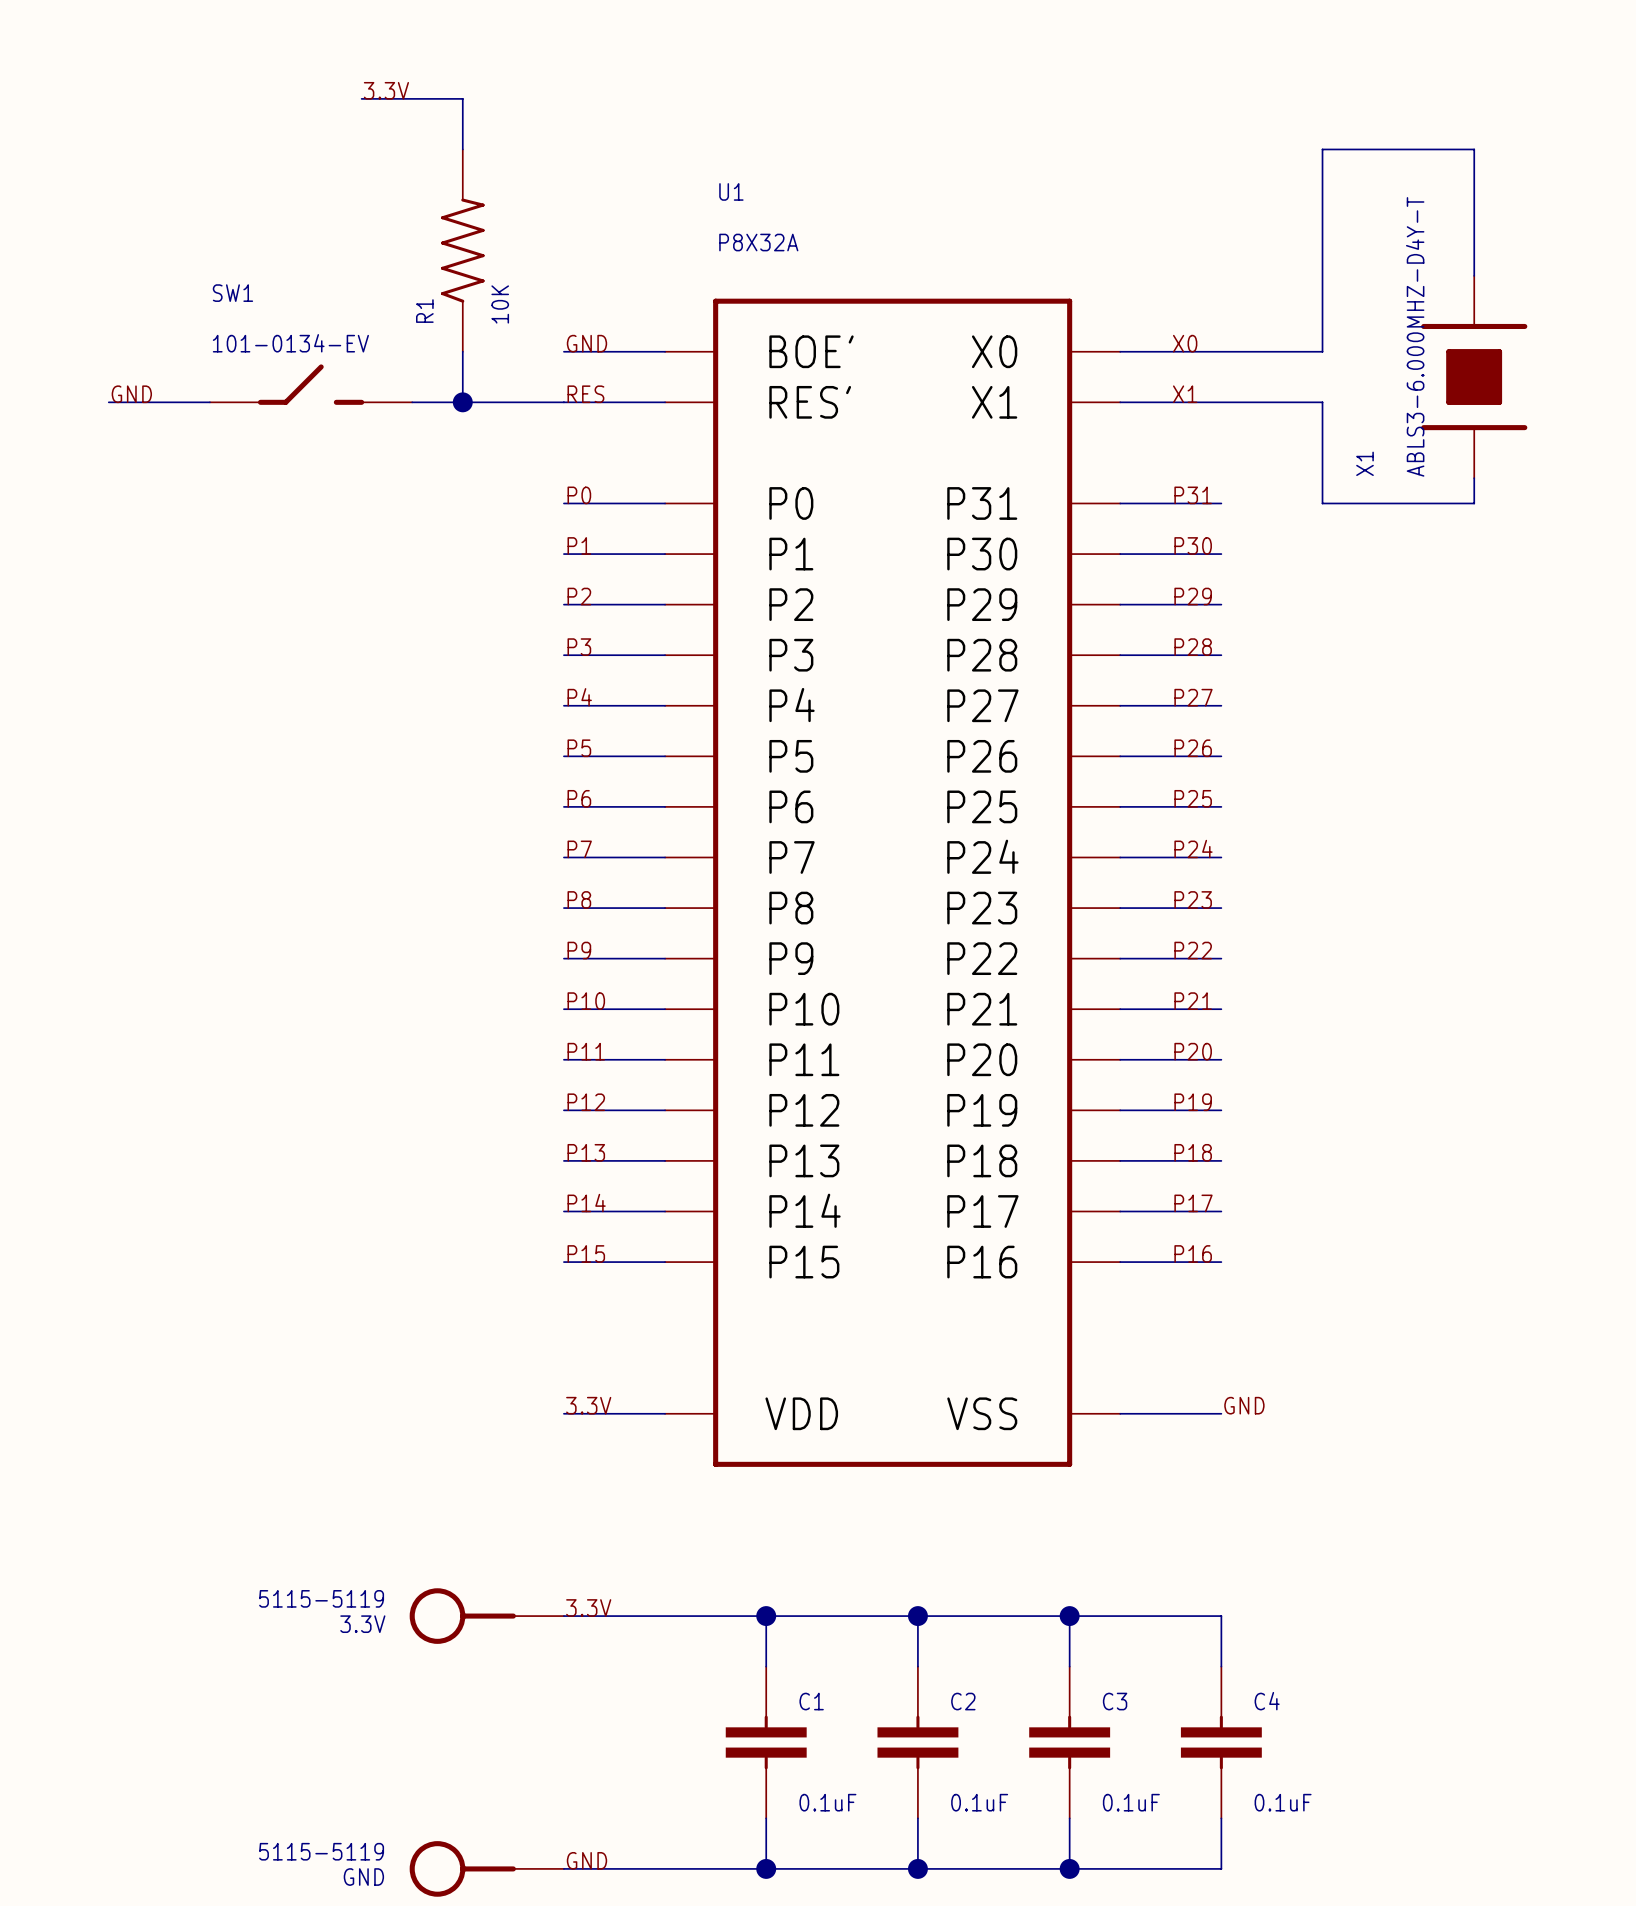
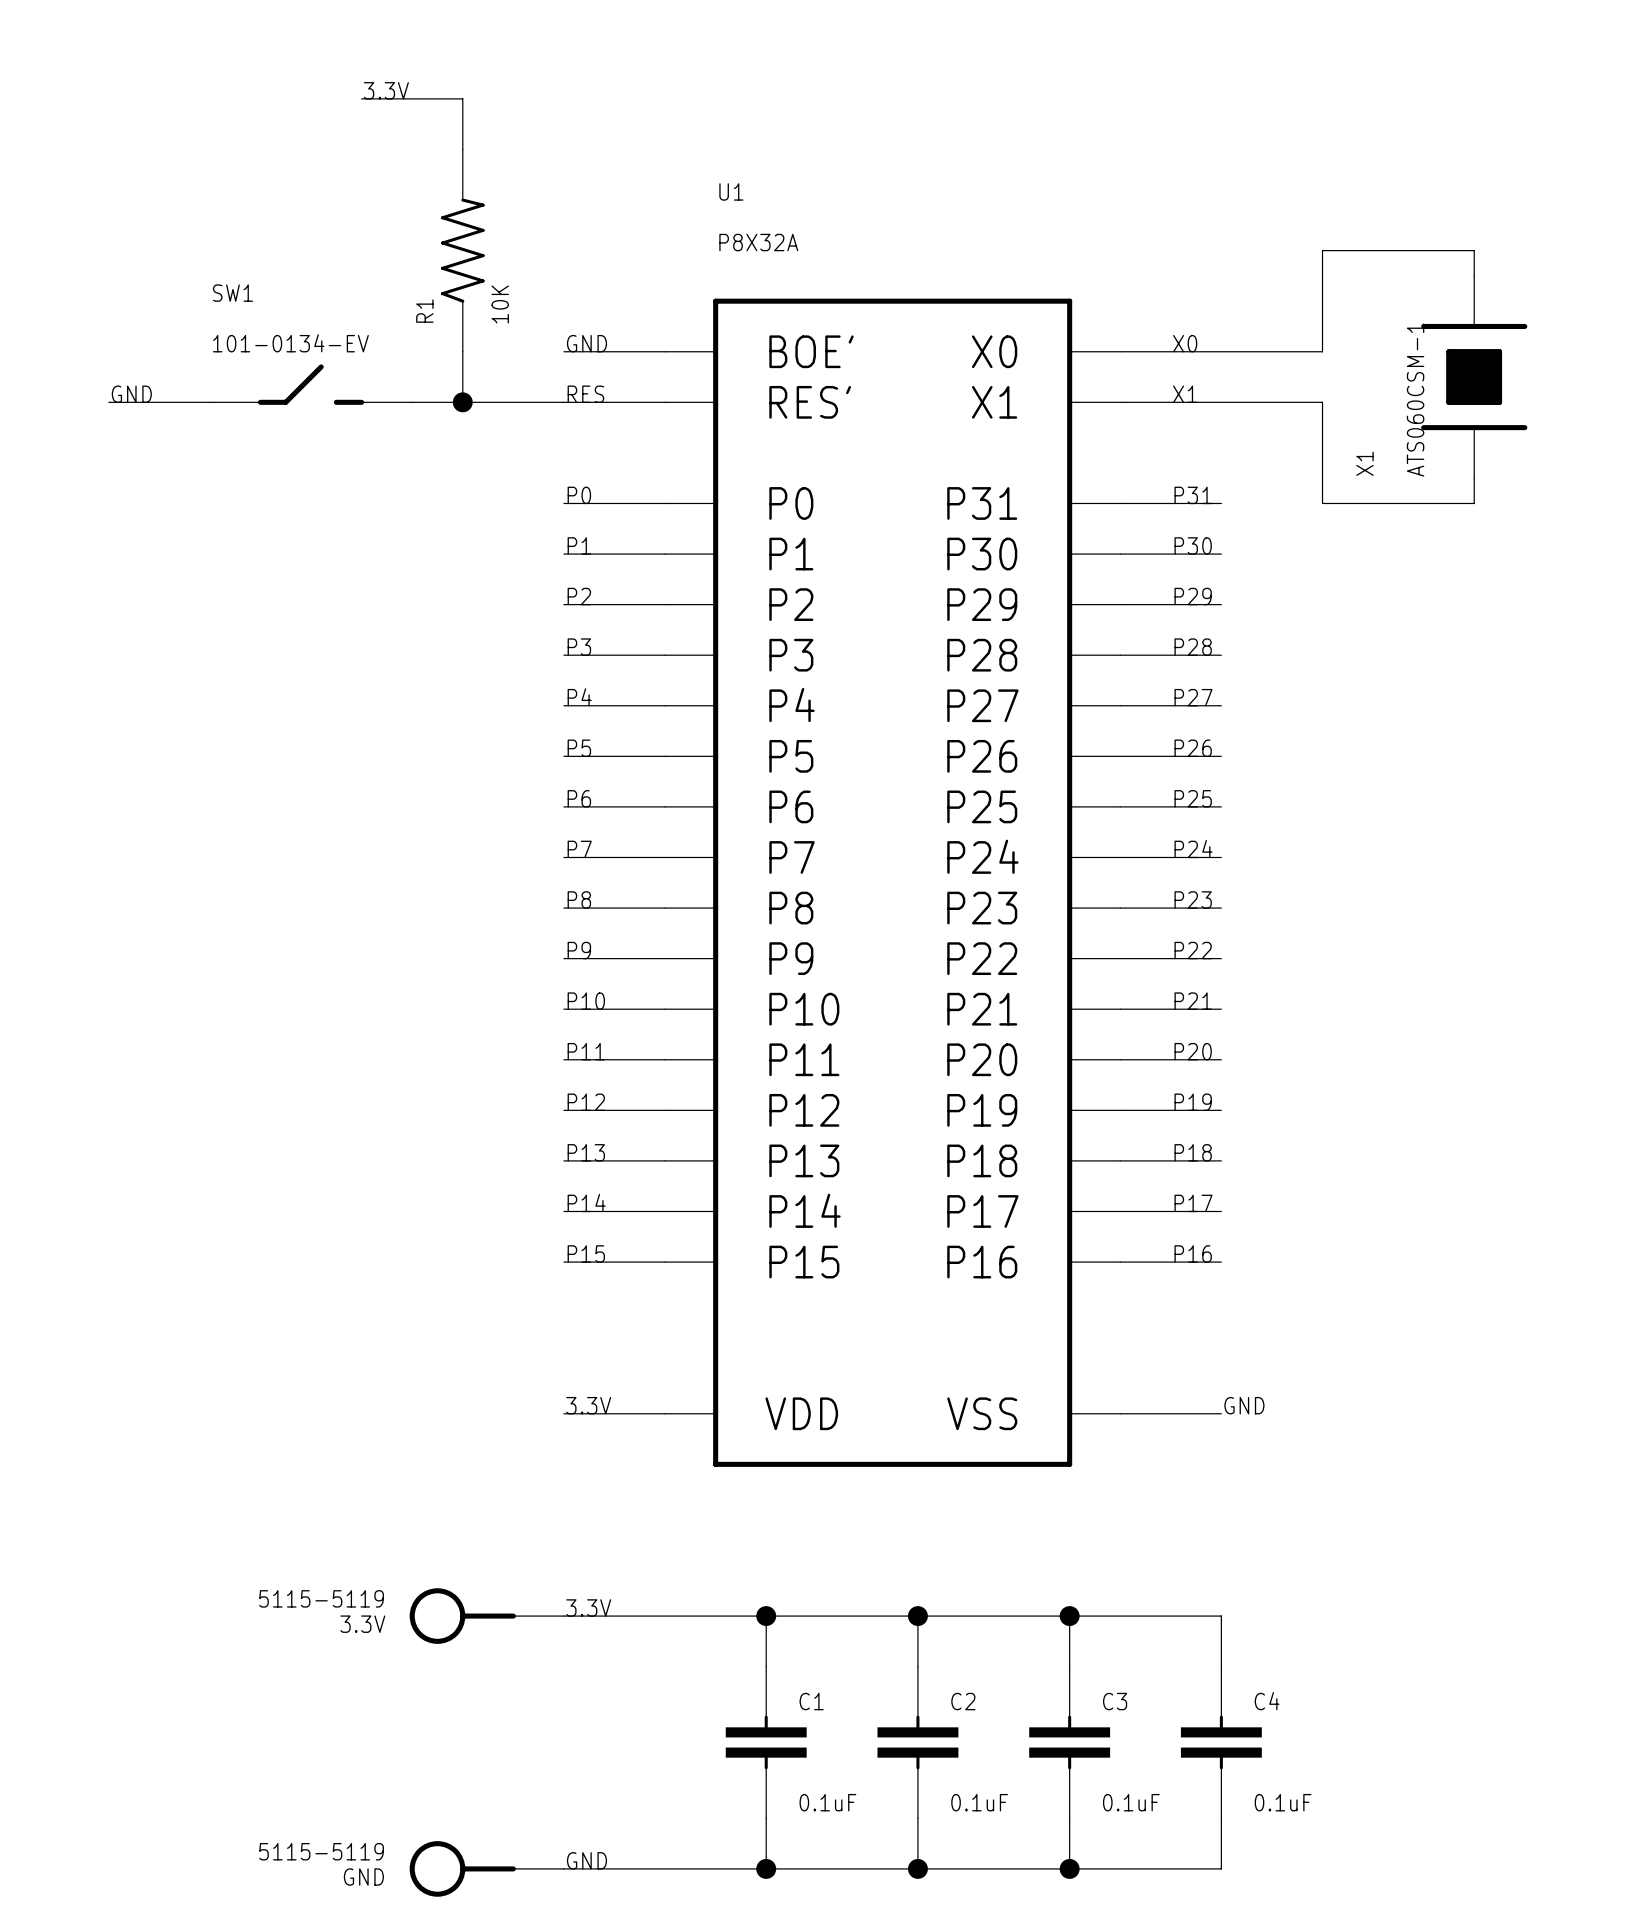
wire: (1322, 250) (1322, 149) (1474, 149) (1474, 250) -> (1322, 250) (1474, 250)
X1 value: ABLS3-6.000MHZ-D4Y-T (1415, 336) -> ATS060CSM-1 (1415, 400)

